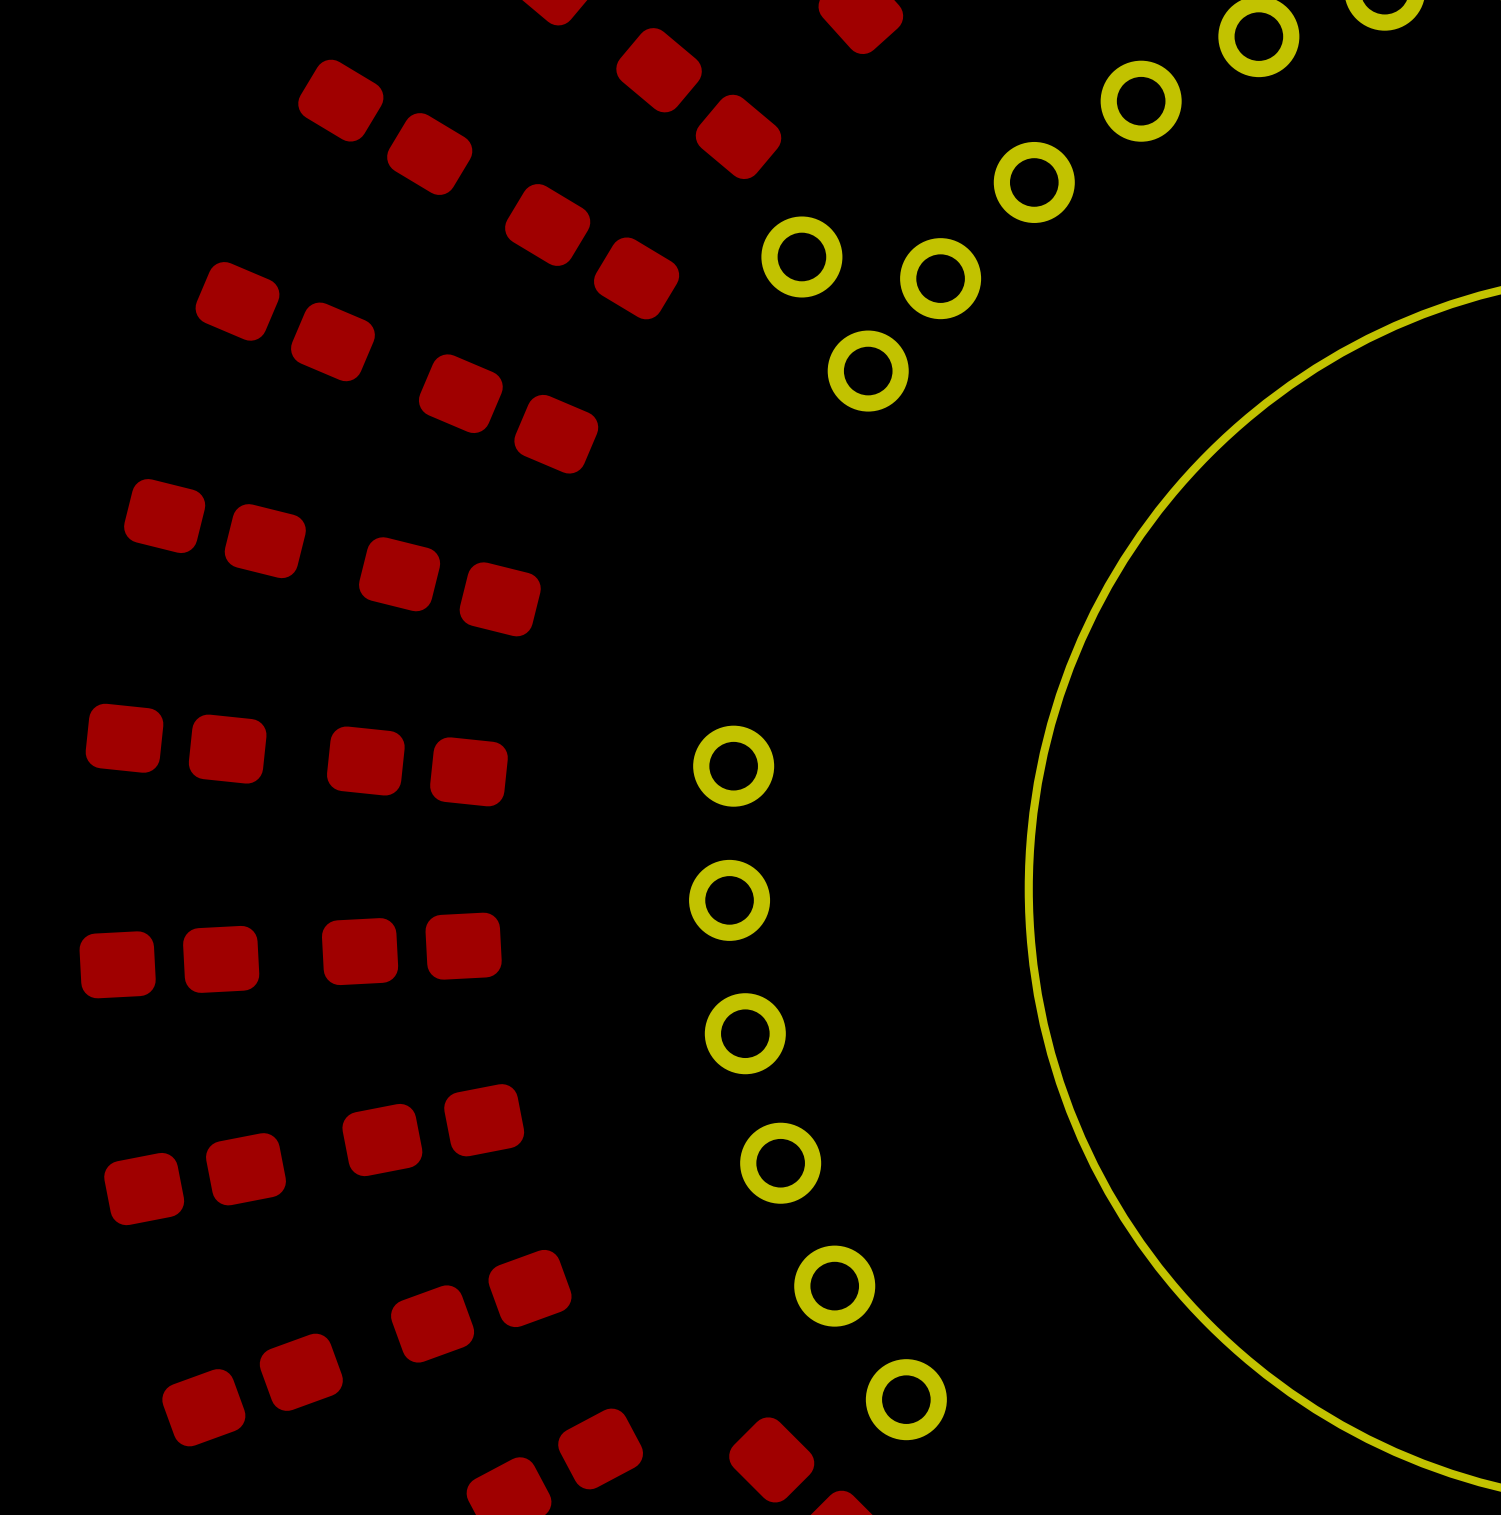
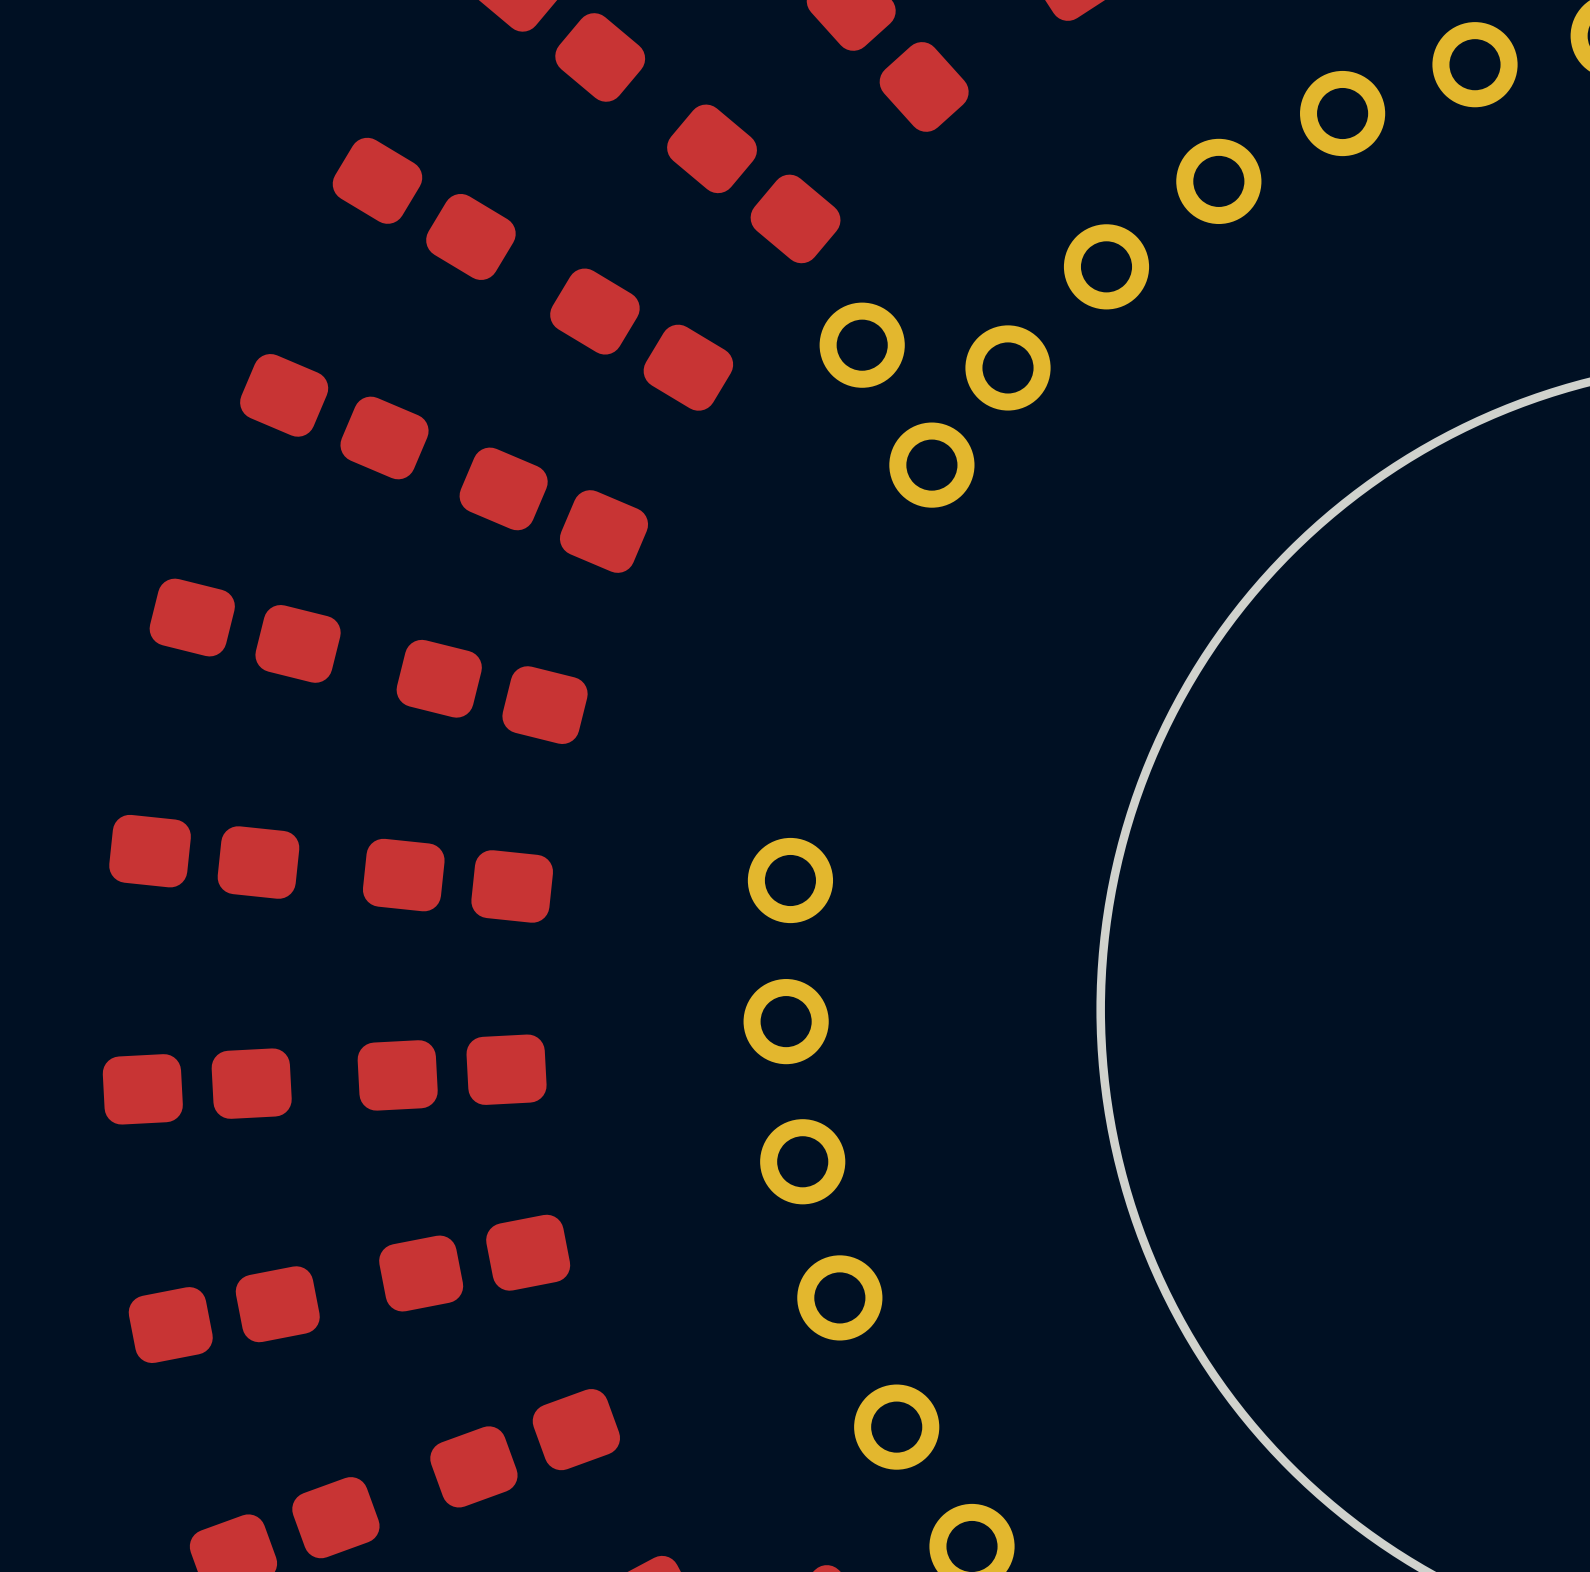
part position: (285, 321) -> (334, 416)

